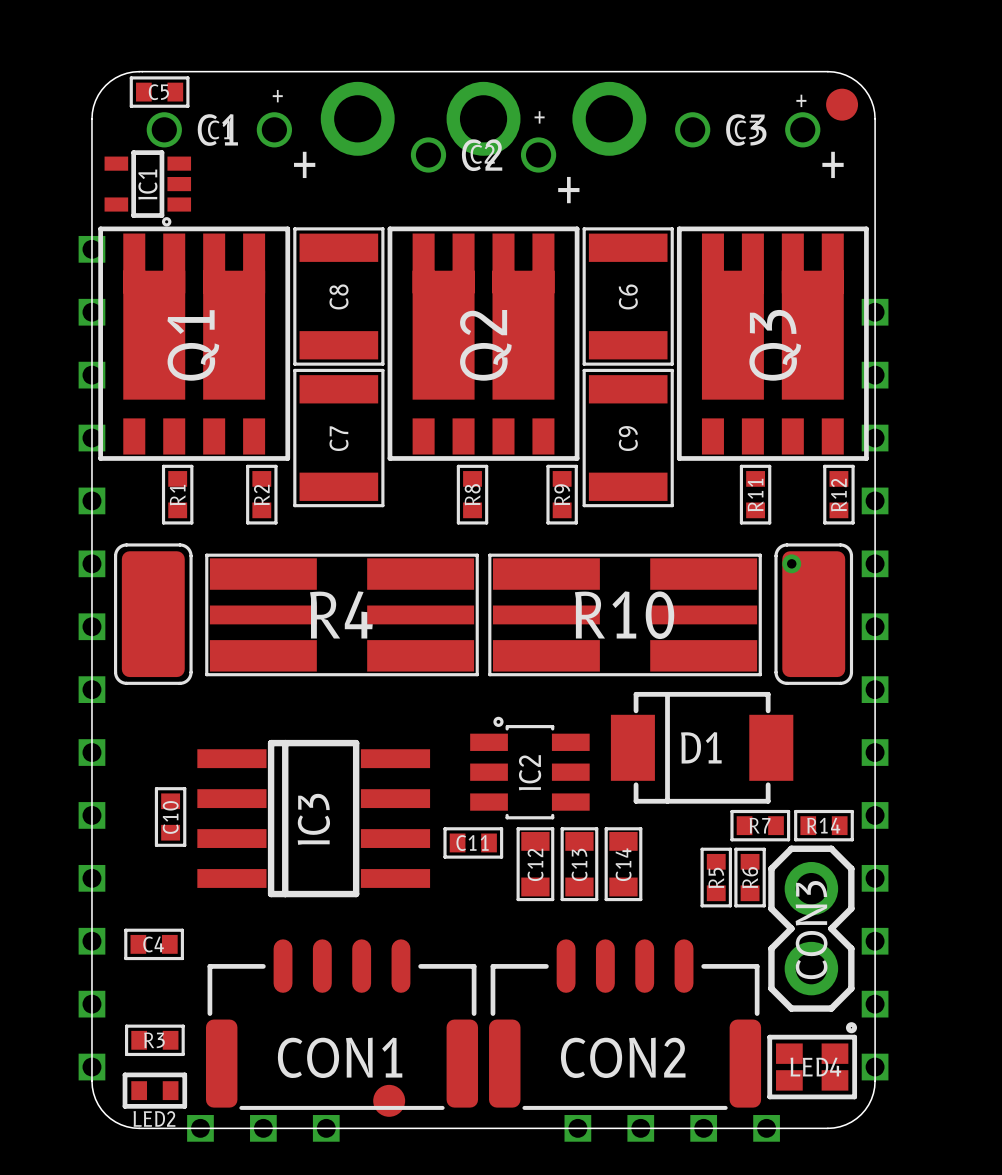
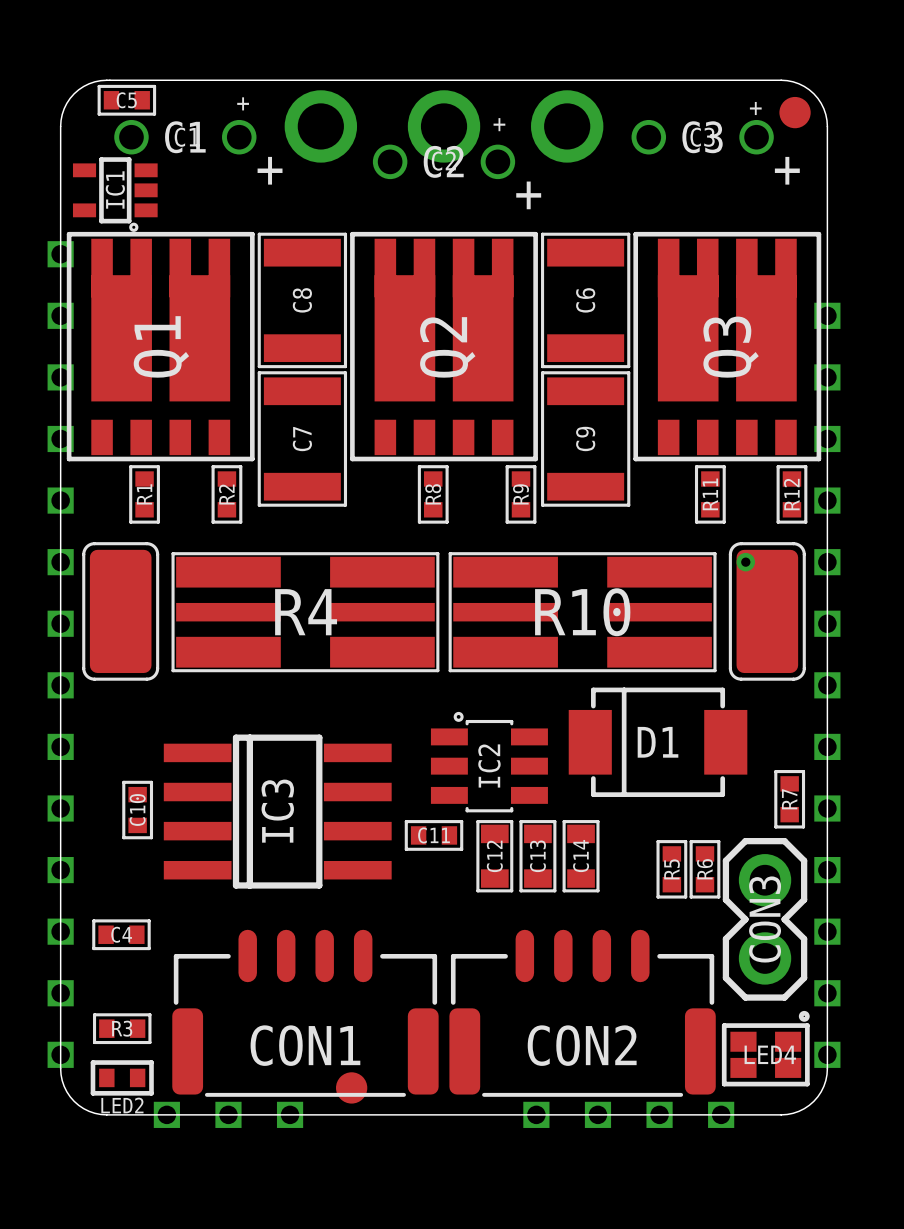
R7 rotation: 0° (760, 825) -> 90° clockwise (789, 799)
R7 position: (760, 825) -> (789, 799)
R14: (823, 825) -> none

